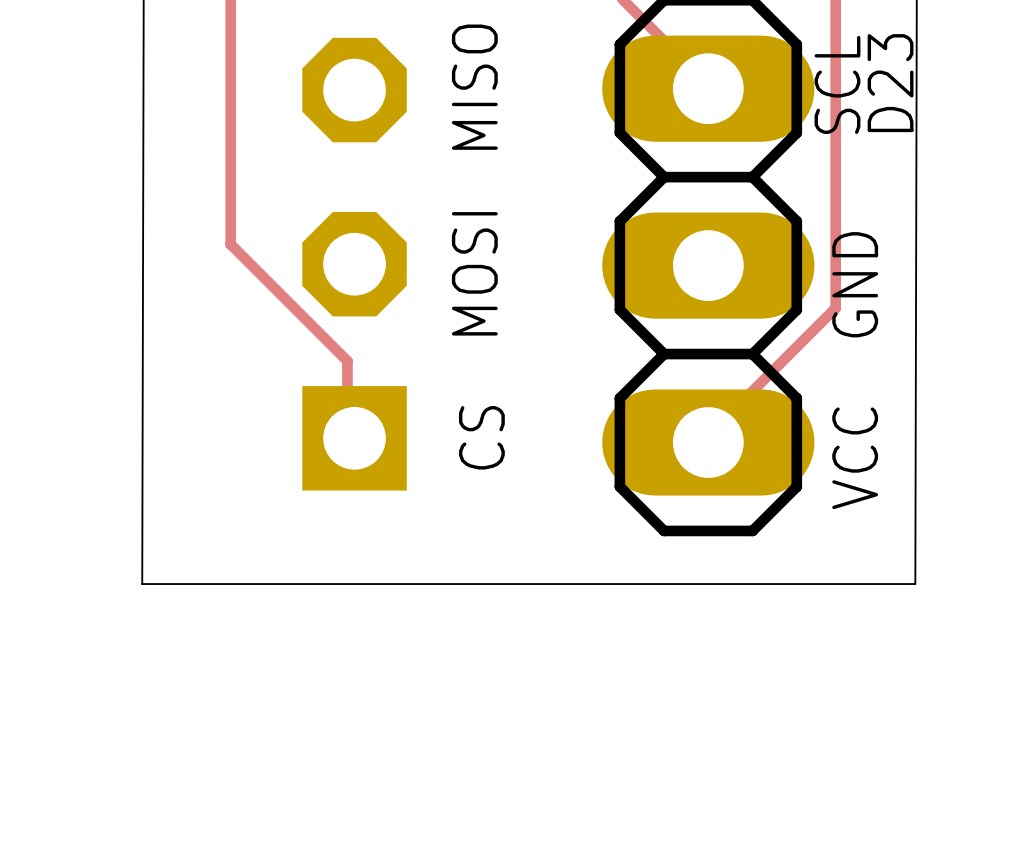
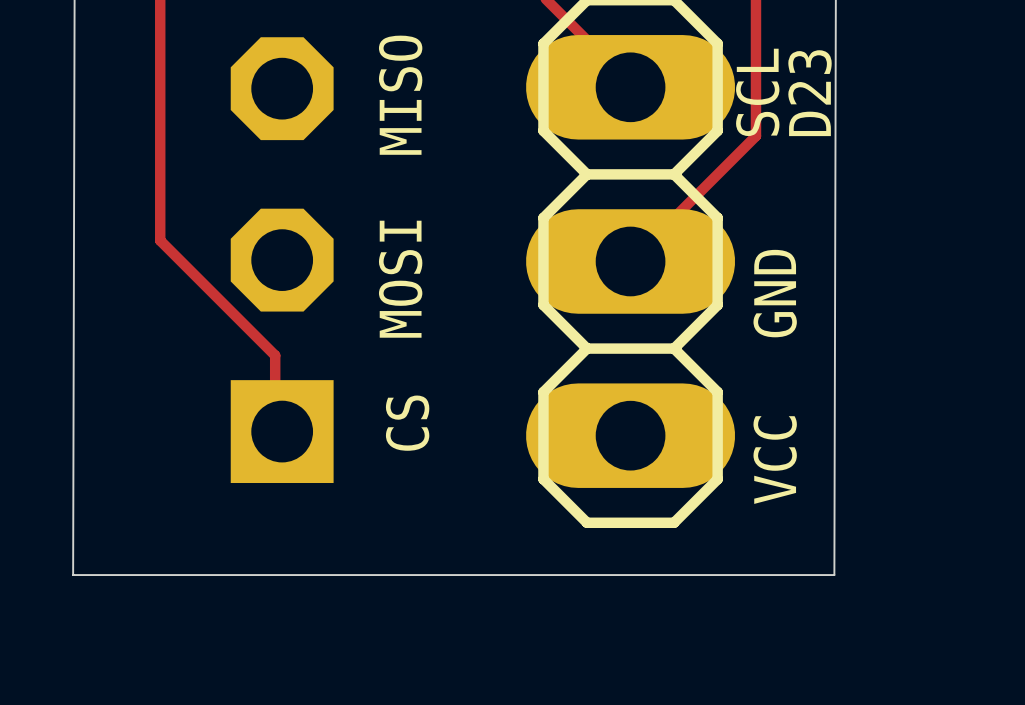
track: (835, 138) (835, 308) (708, 435) (708, 442) -> (755, 136) (630, 261)

